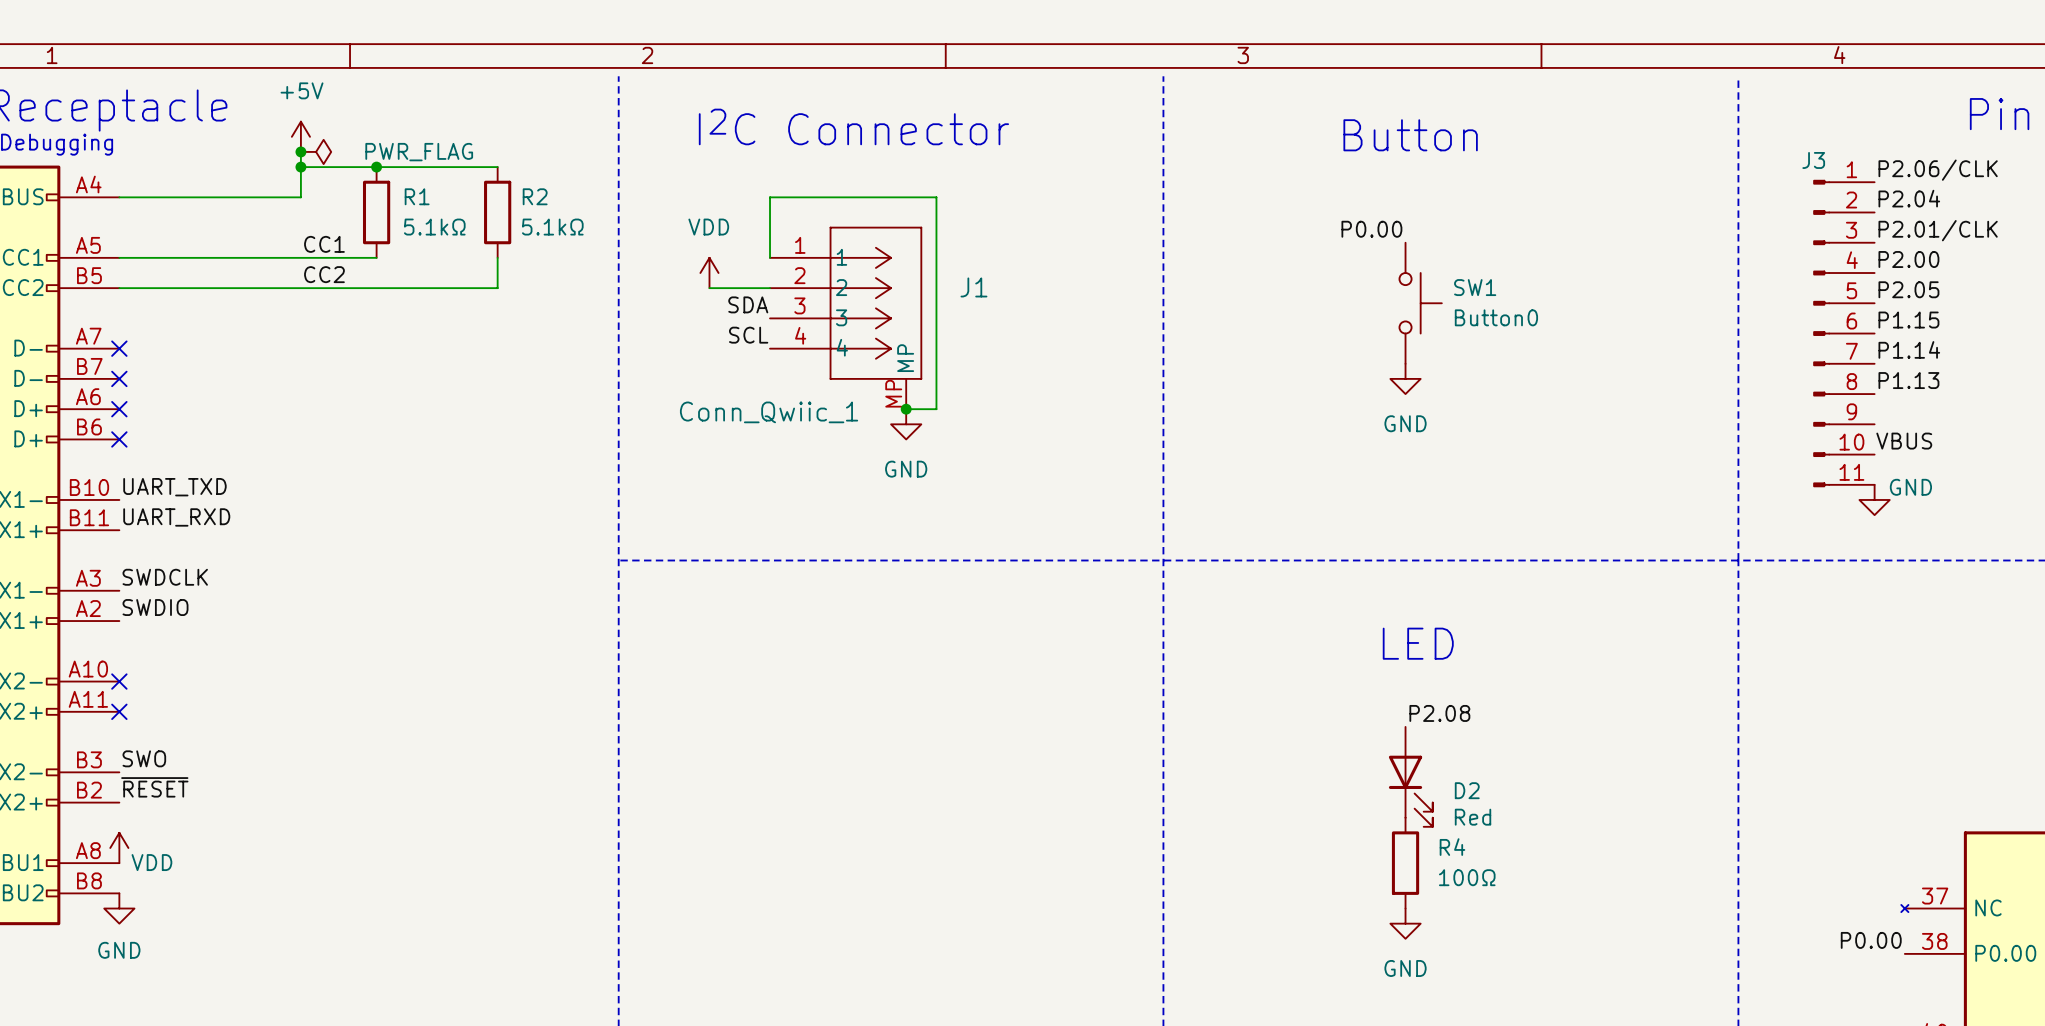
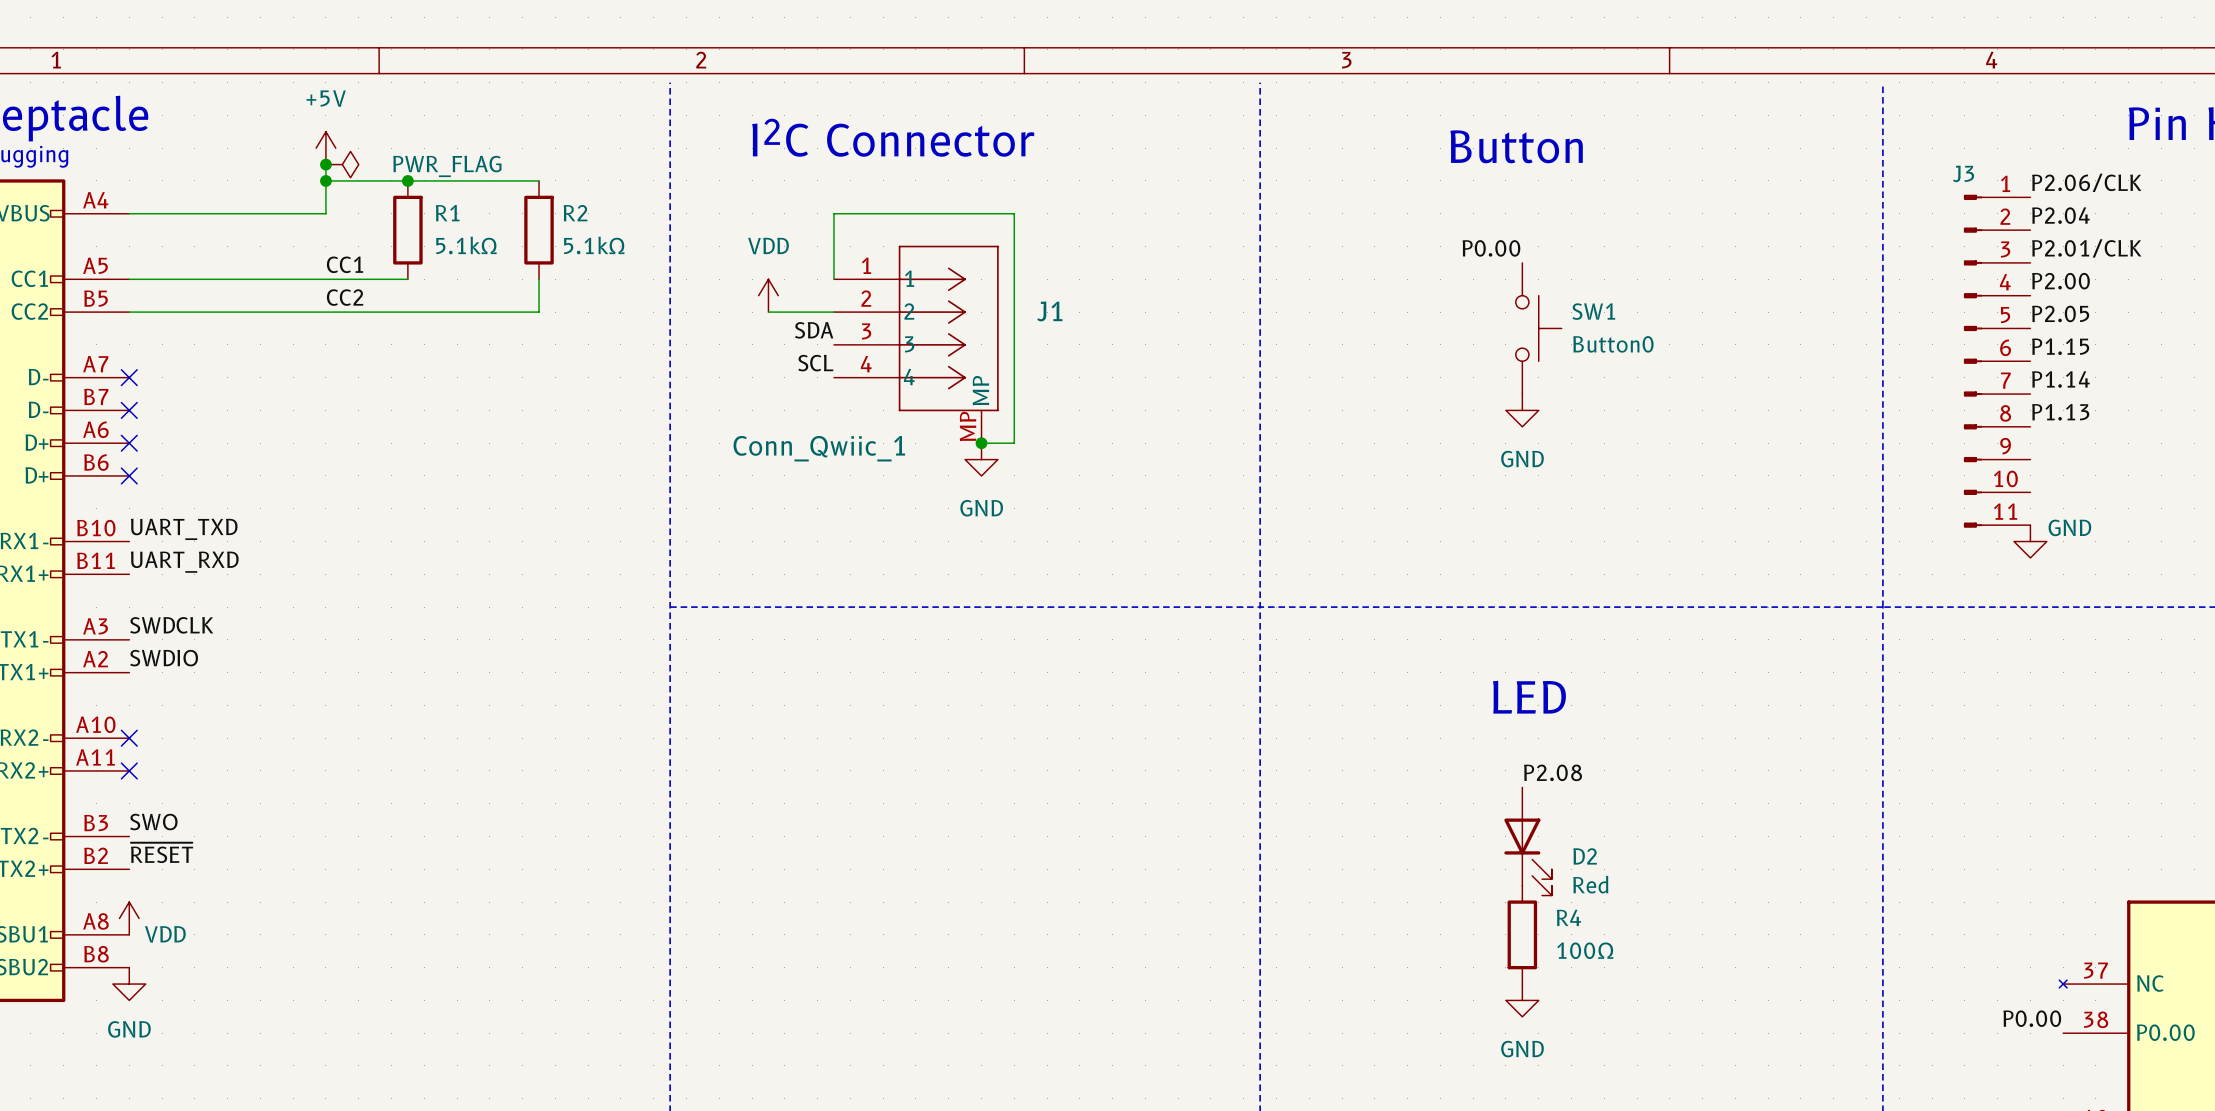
label: VBUS (1904, 441) -> none

